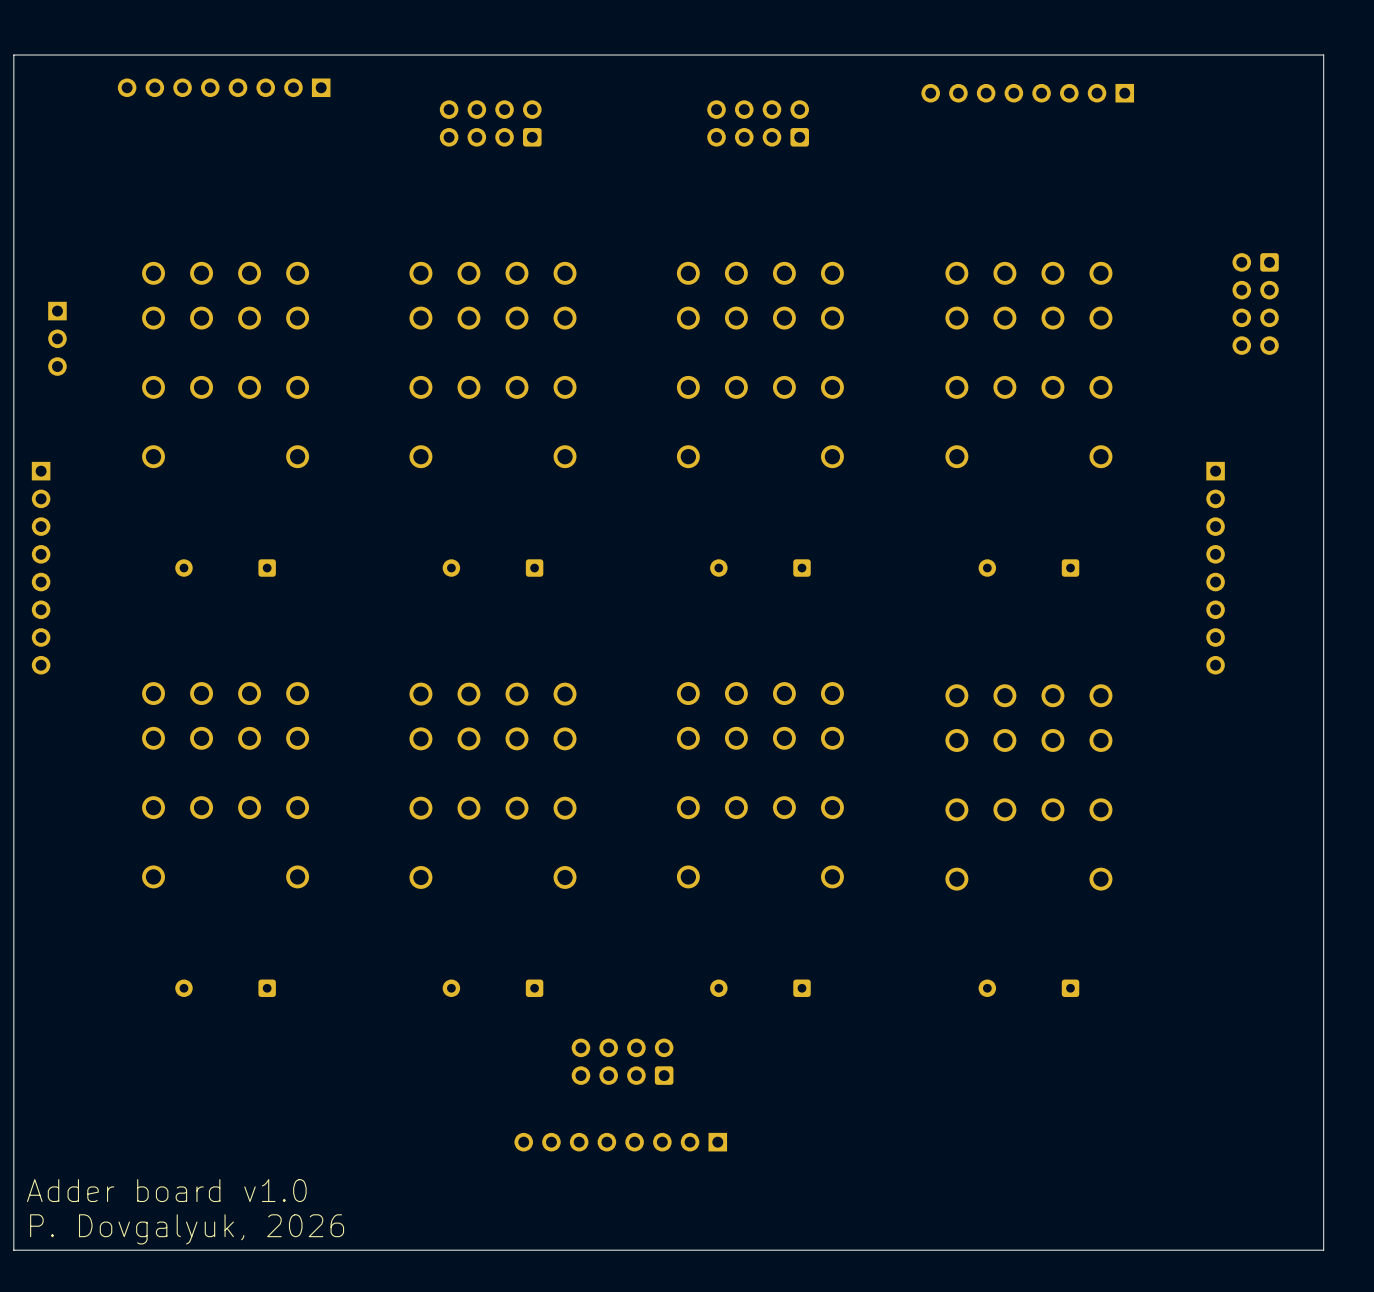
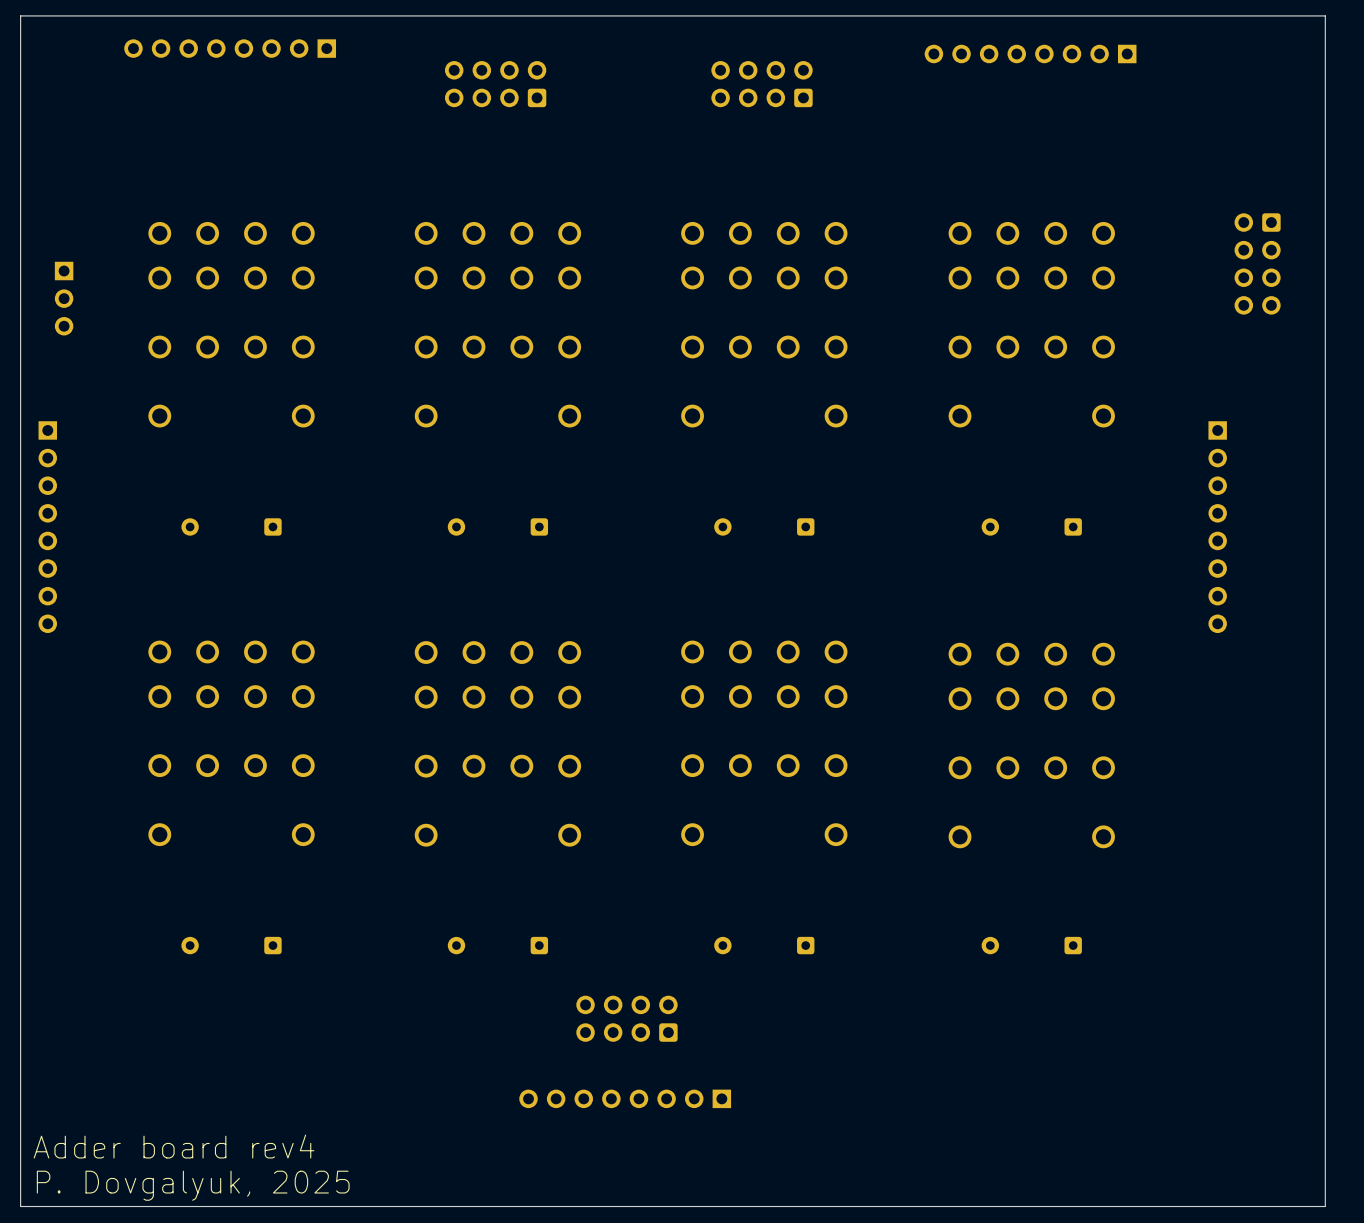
text: Adder board v1.0 (166, 1190) -> Adder board rev4 (174, 1146)
text: P. Dovgalyuk, 2026 (187, 1229) -> P. Dovgalyuk, 2025 (193, 1185)

